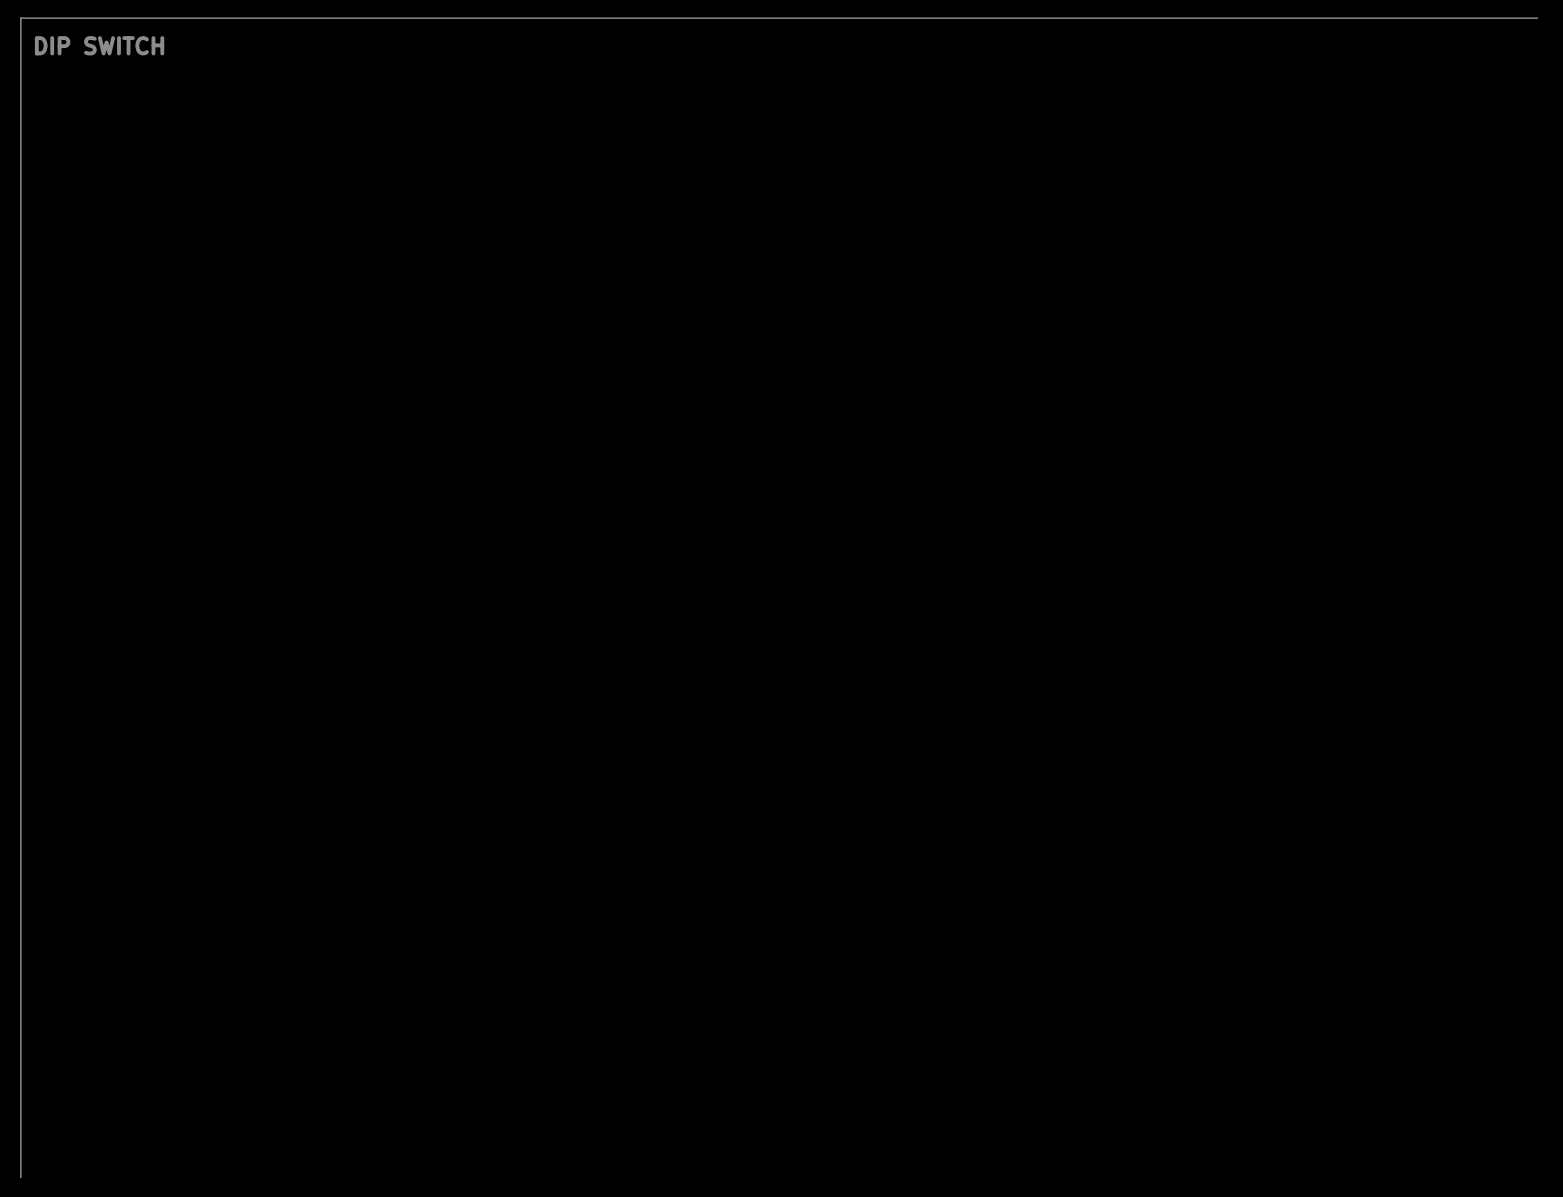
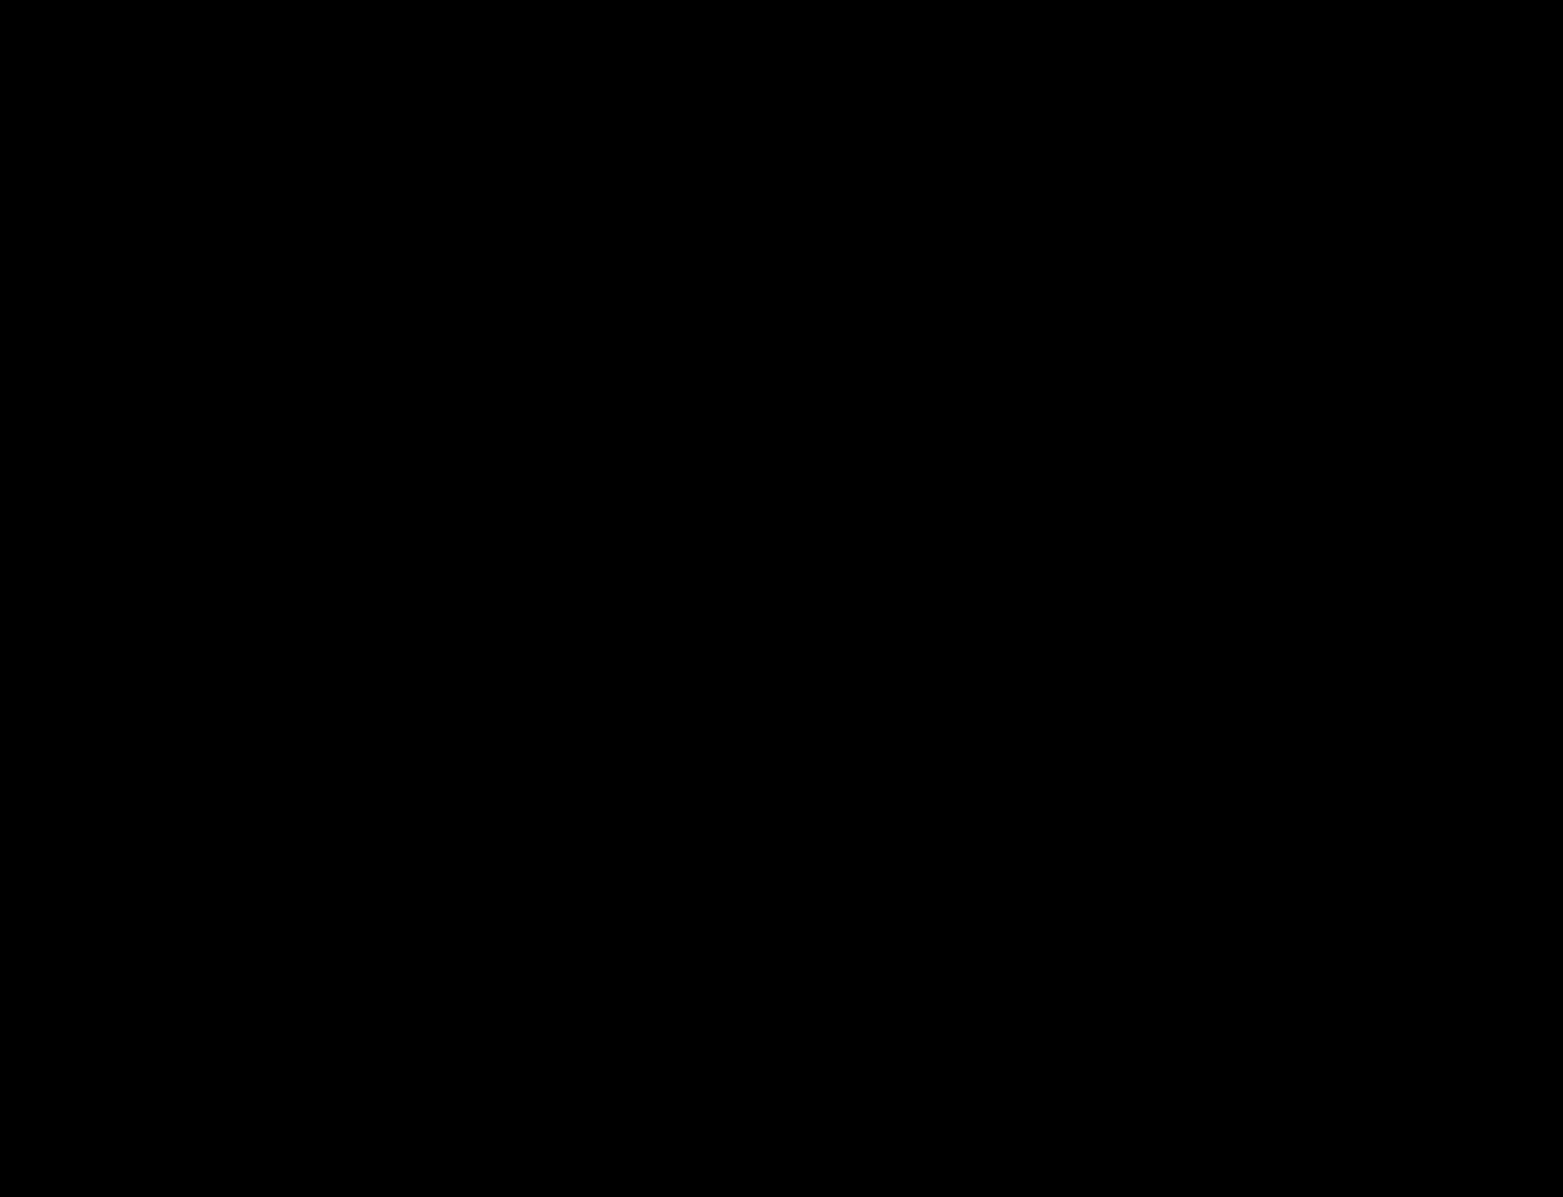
line: (1537, 18) (20, 18) (20, 1177) -> none
text: DIP SWITCH (99, 45) -> none

